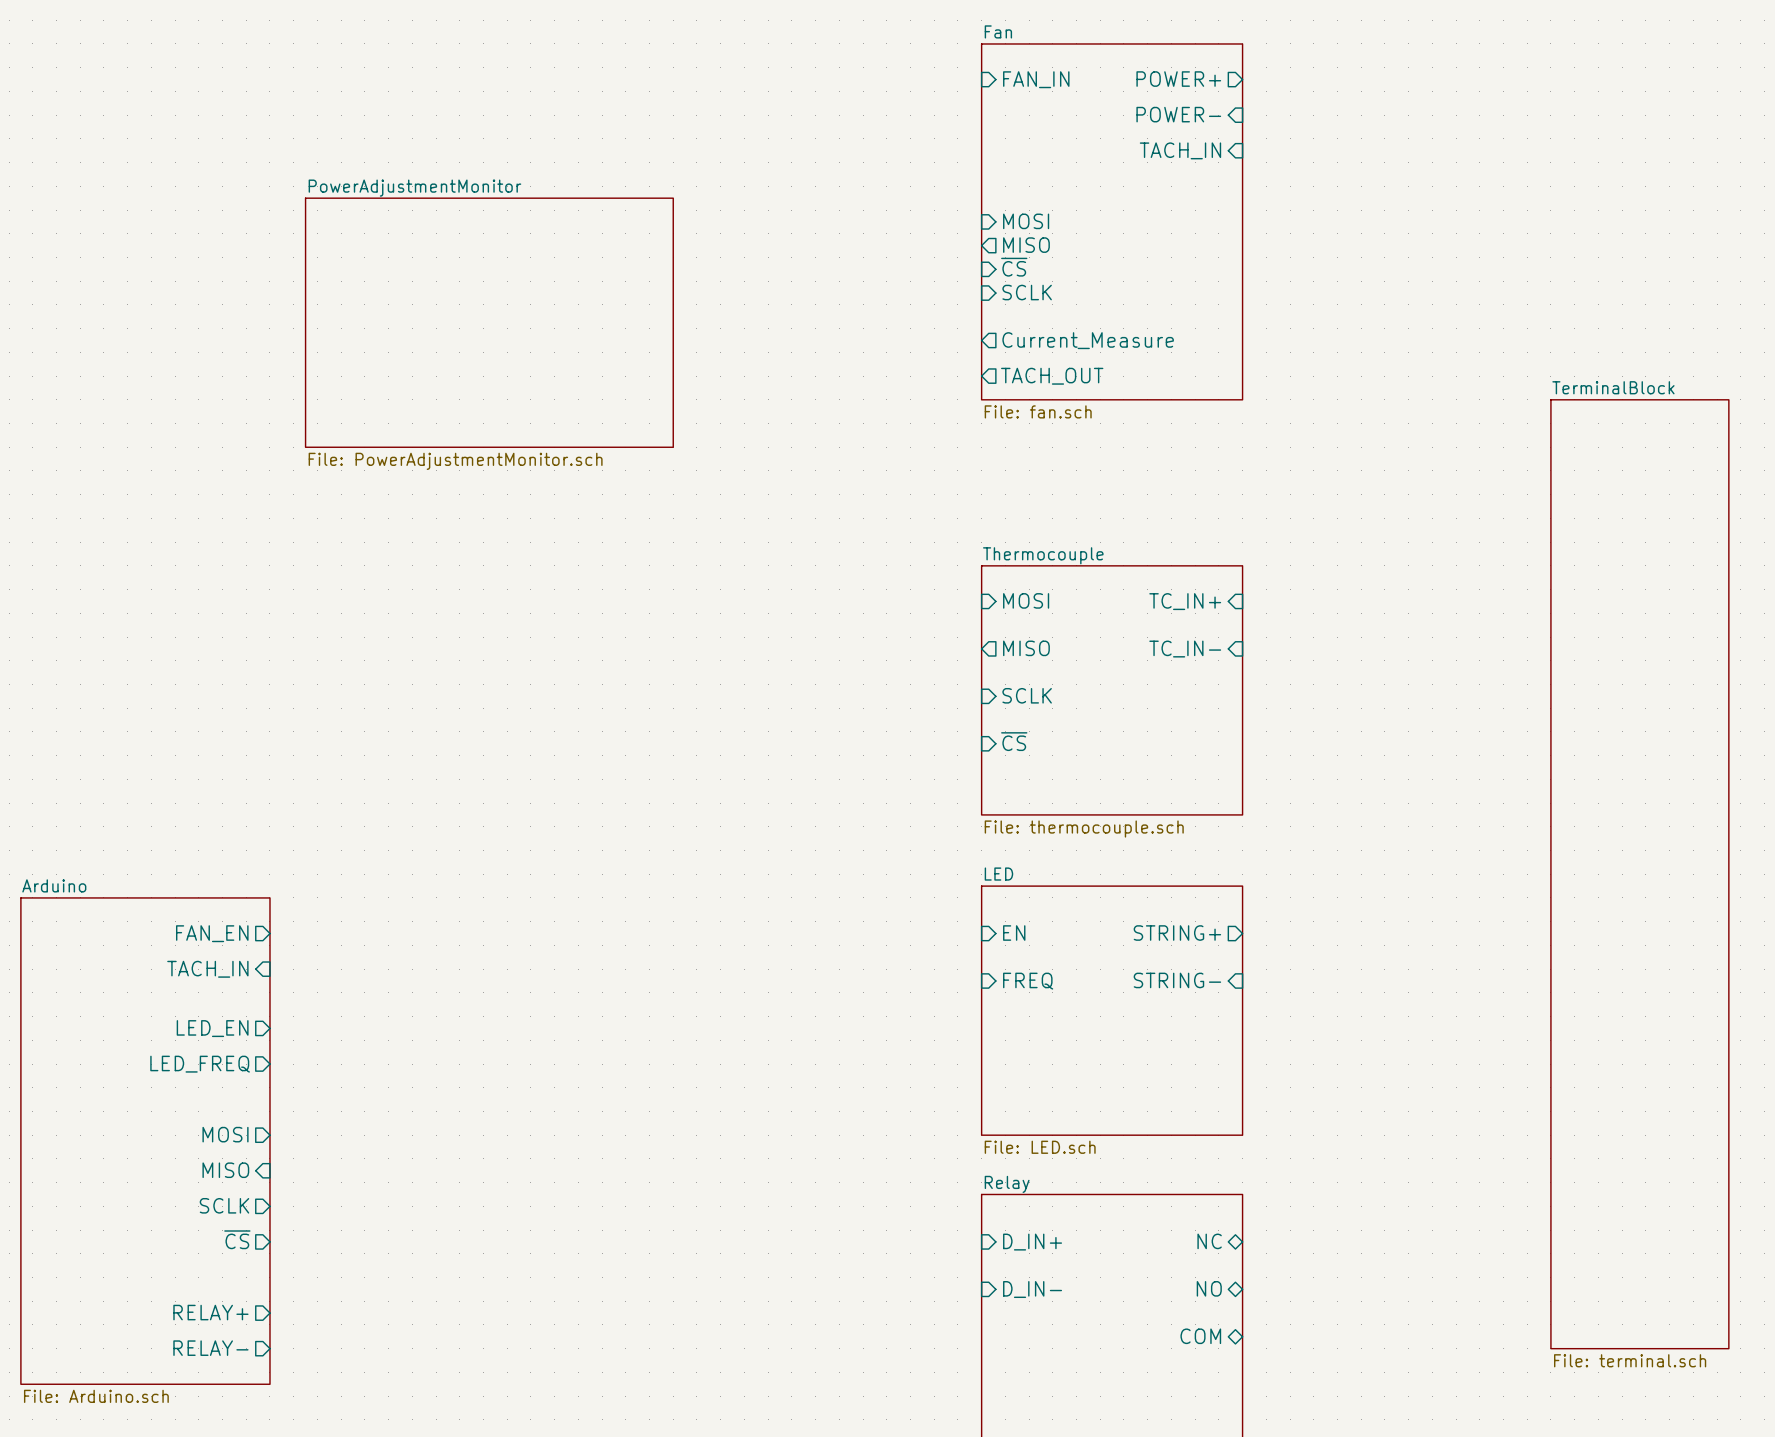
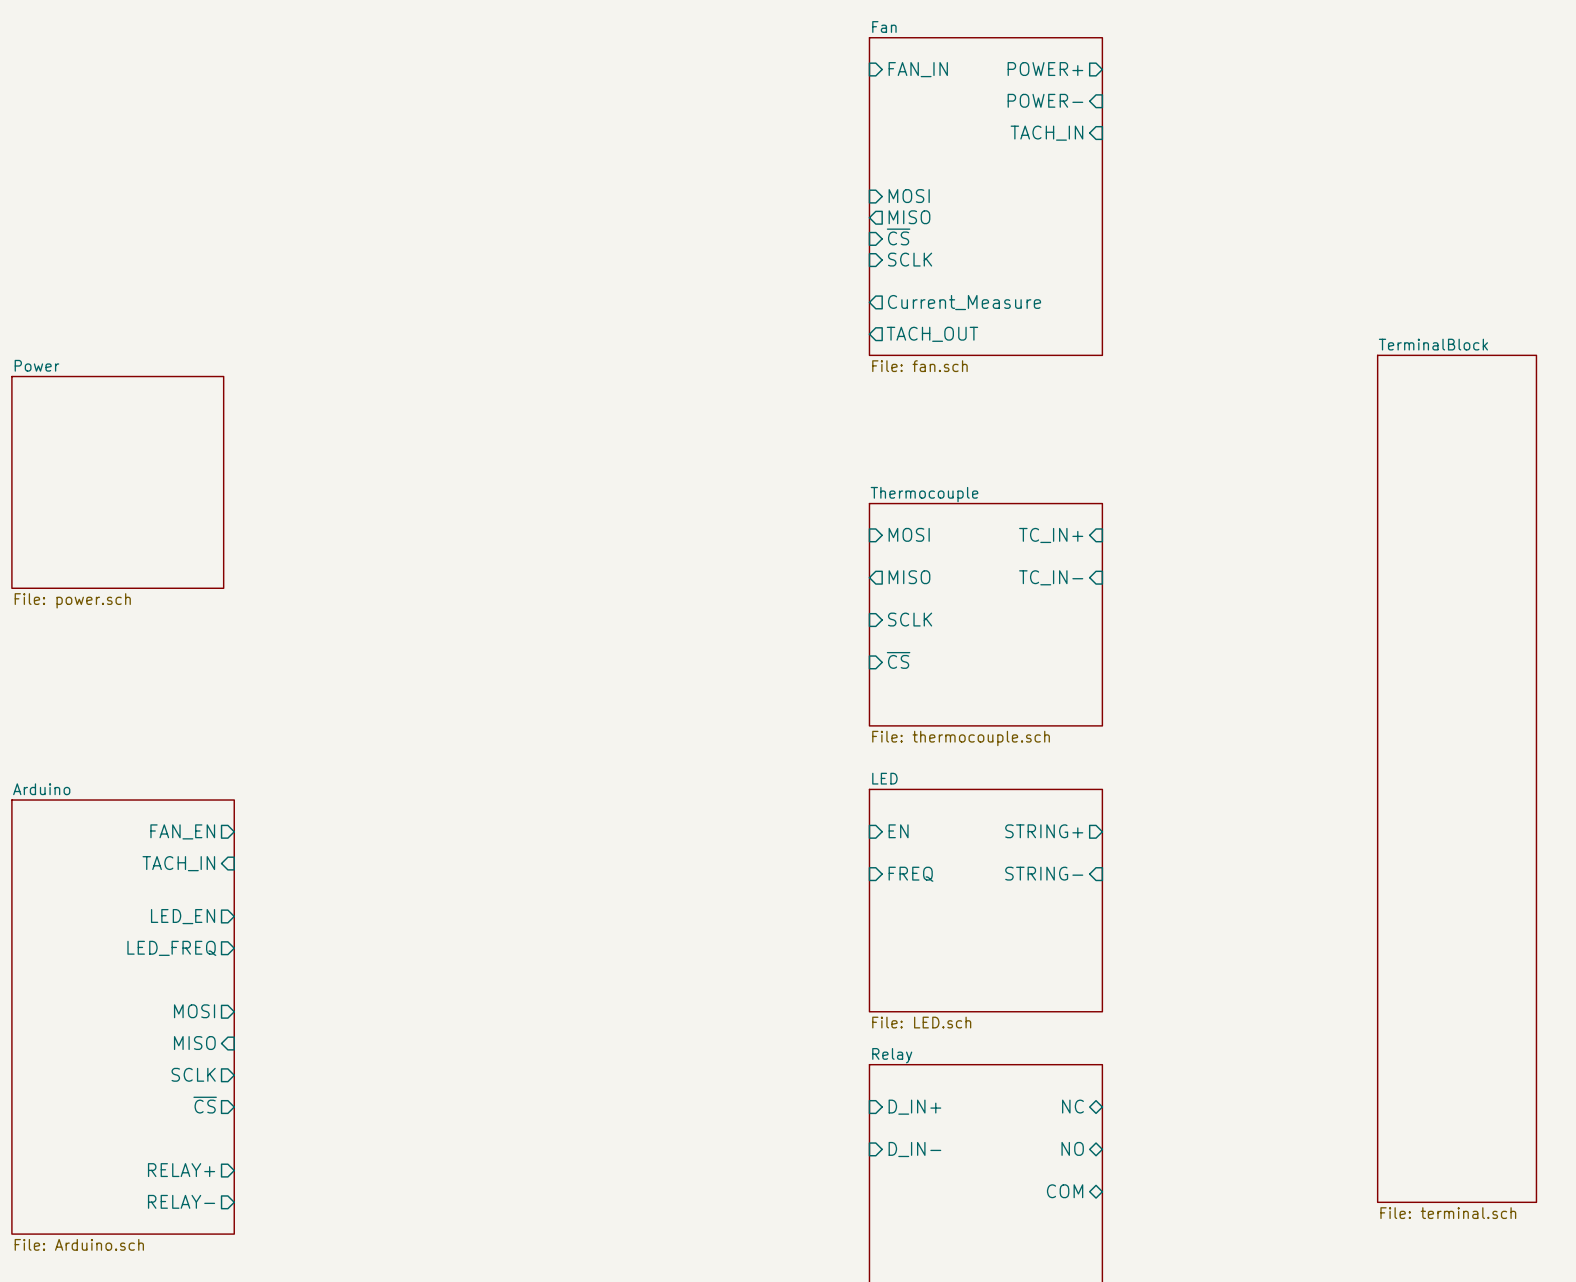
sheet PowerAdjustmentMonitor: File: PowerAdjustmentMonitor.sch (489, 322) -> none
sheet Power: none -> File: power.sch (117, 482)

